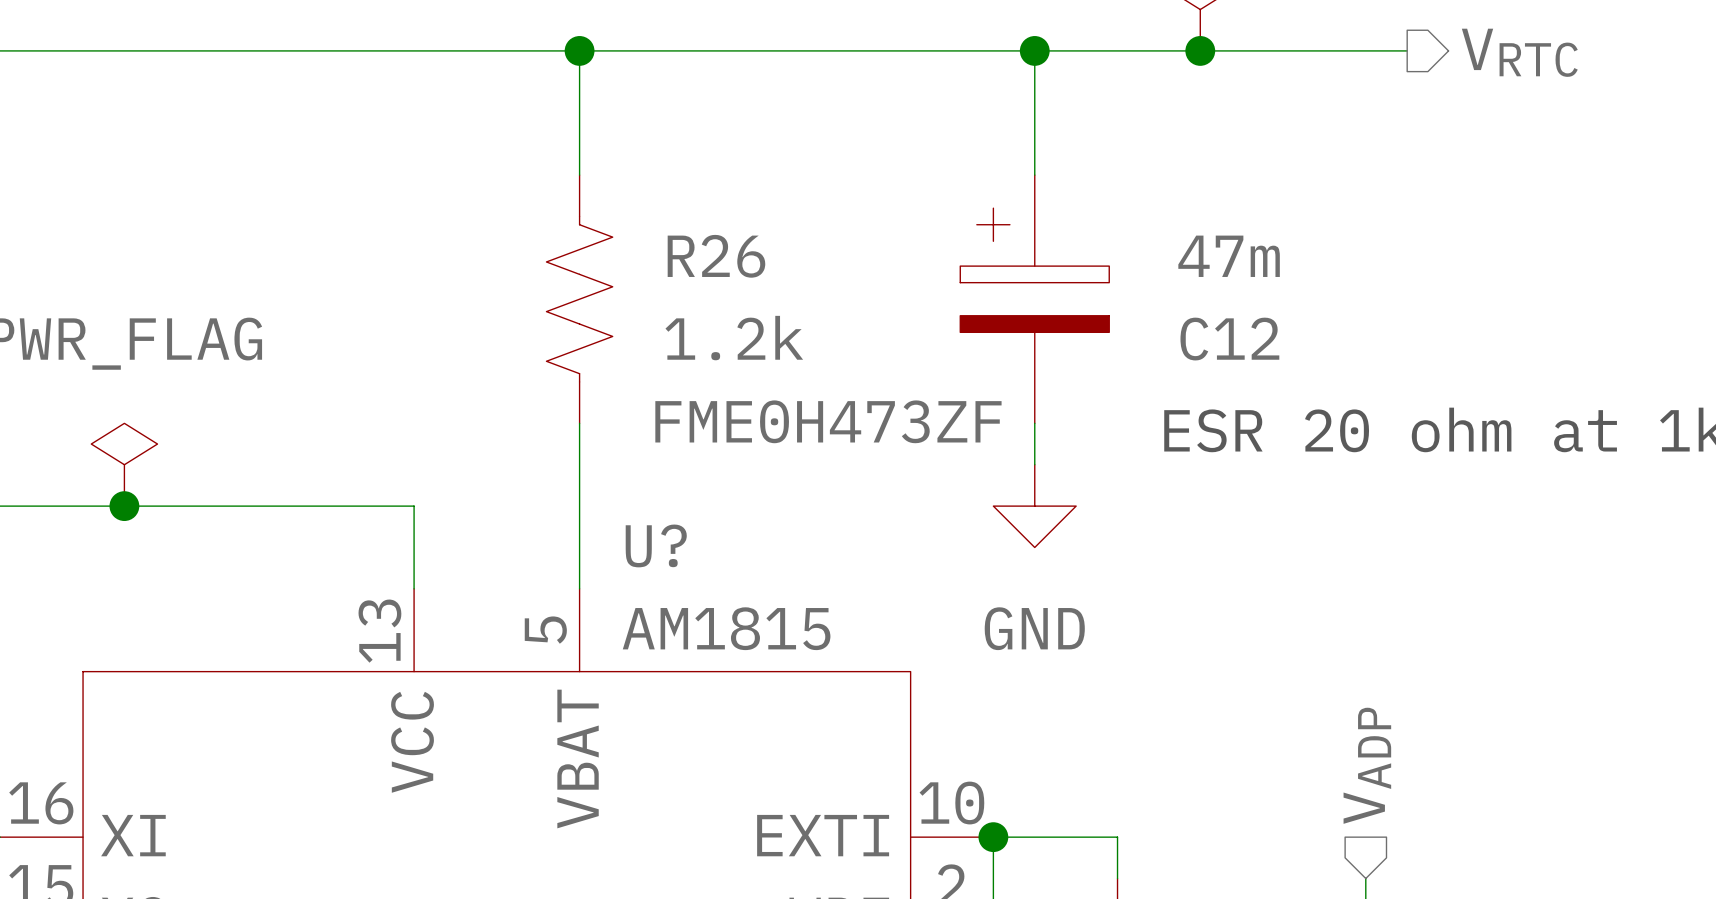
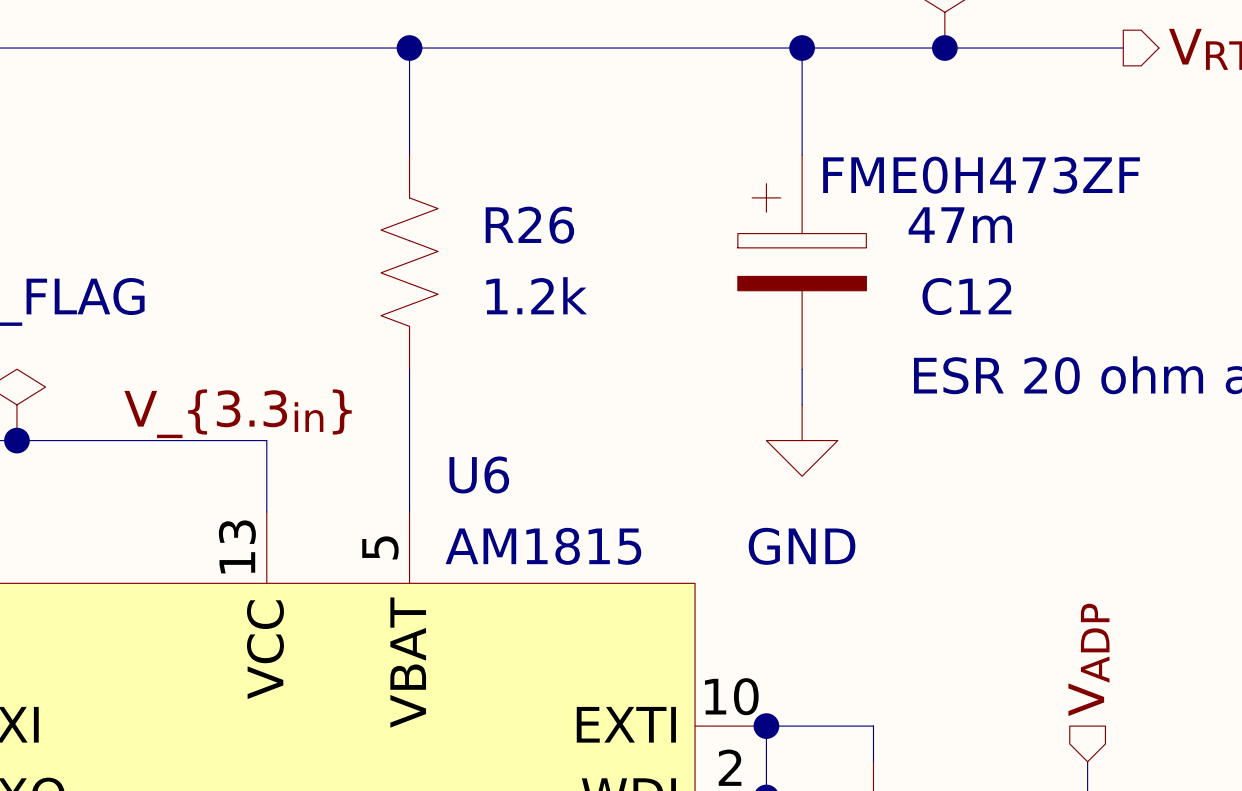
C12 text position: FME0H473ZF (828, 421) -> FME0H473ZF (981, 175)
label: none -> V_{3.3in} (238, 413)
U? name: U? (656, 545) -> U6 (479, 474)

